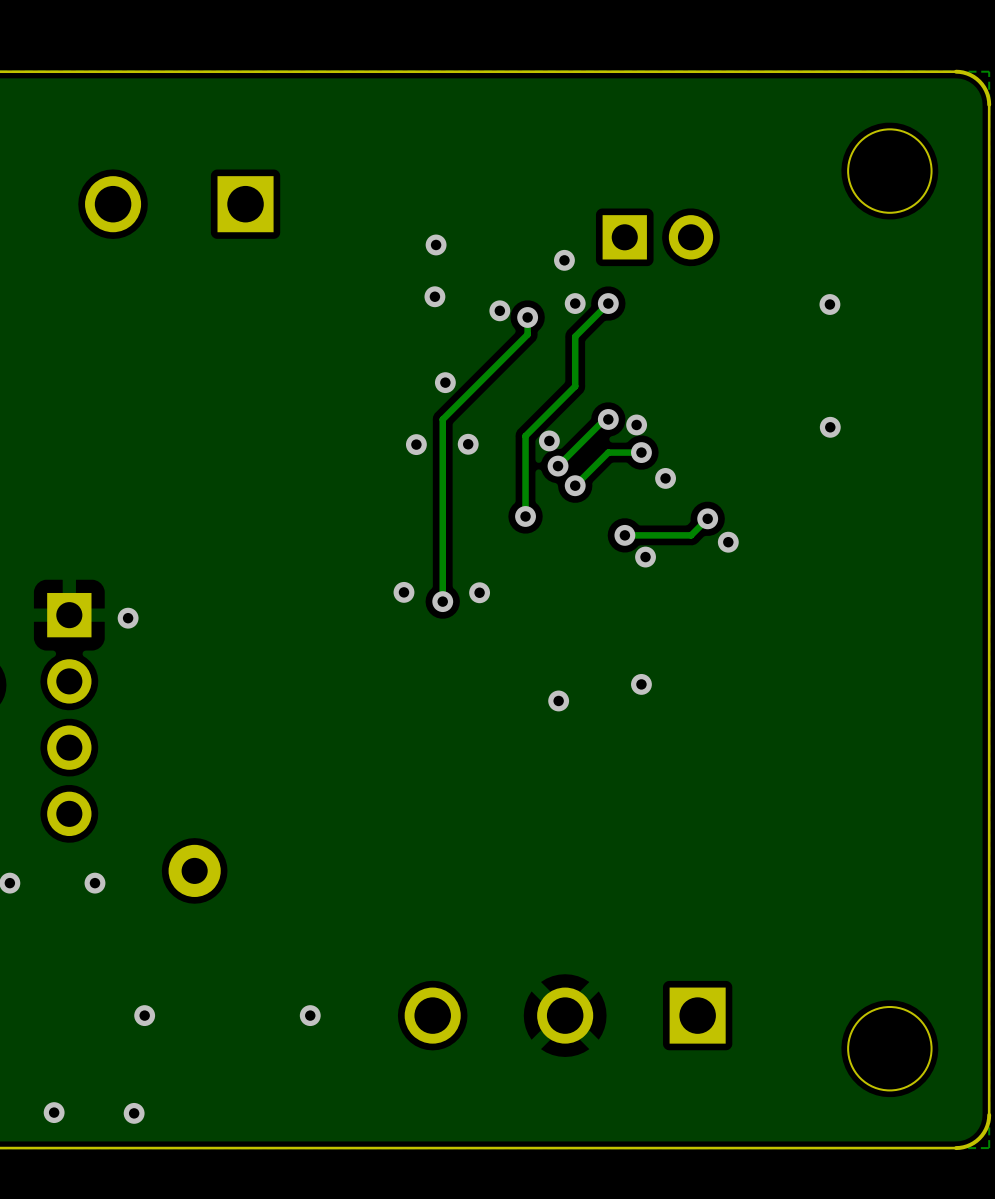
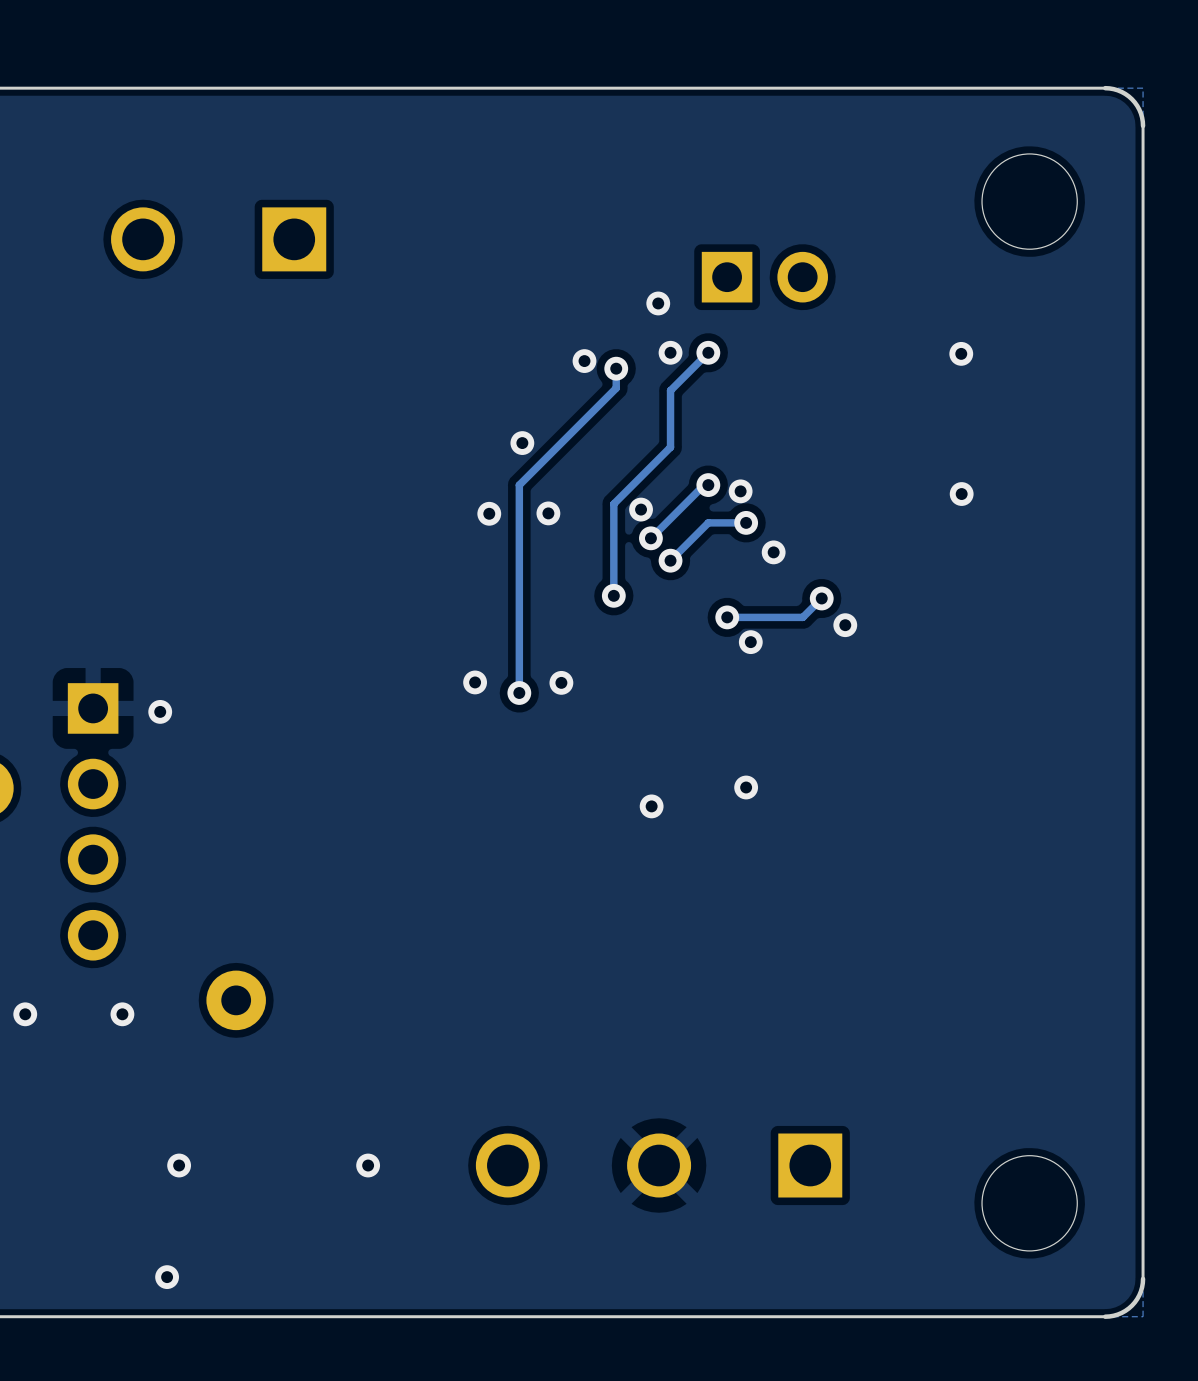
via: (436, 244) -> none
via: (434, 296) -> none
via: (54, 1112) -> none

